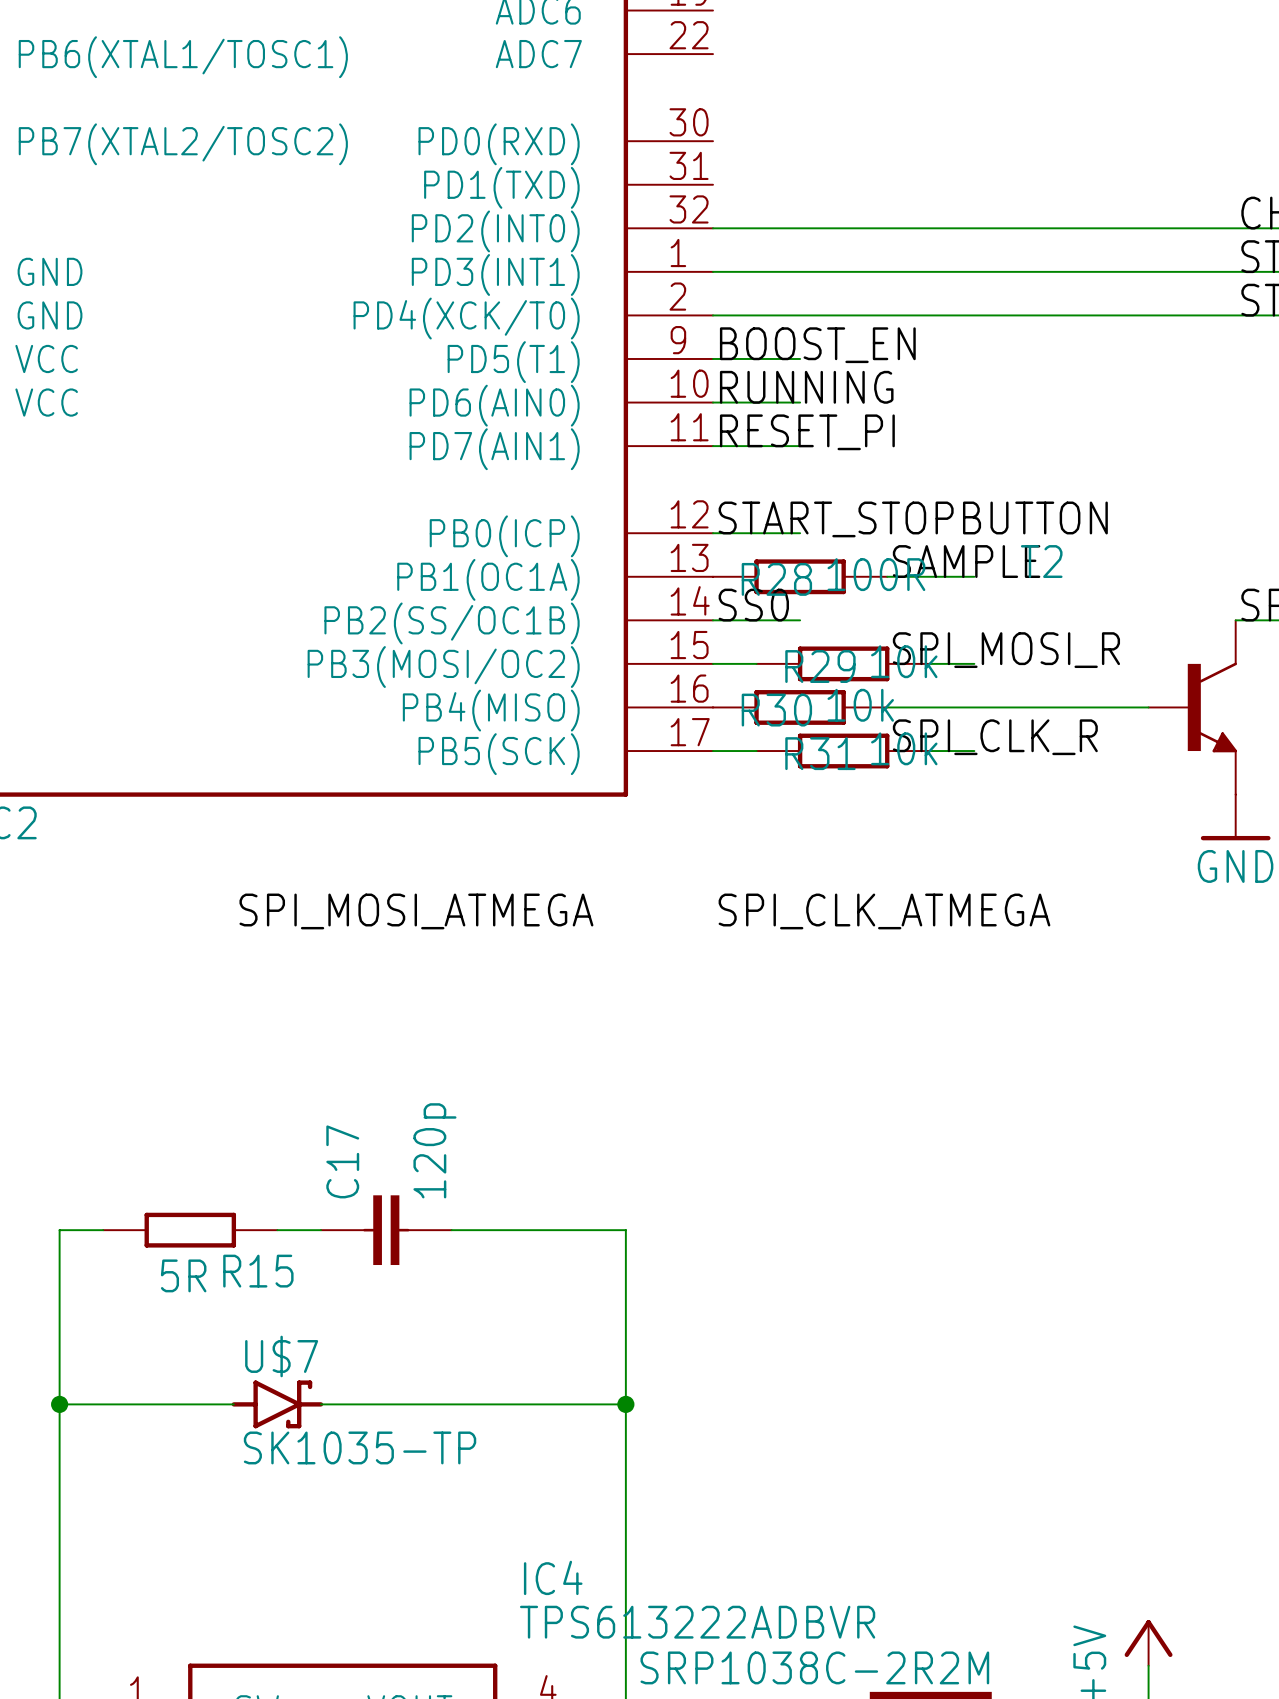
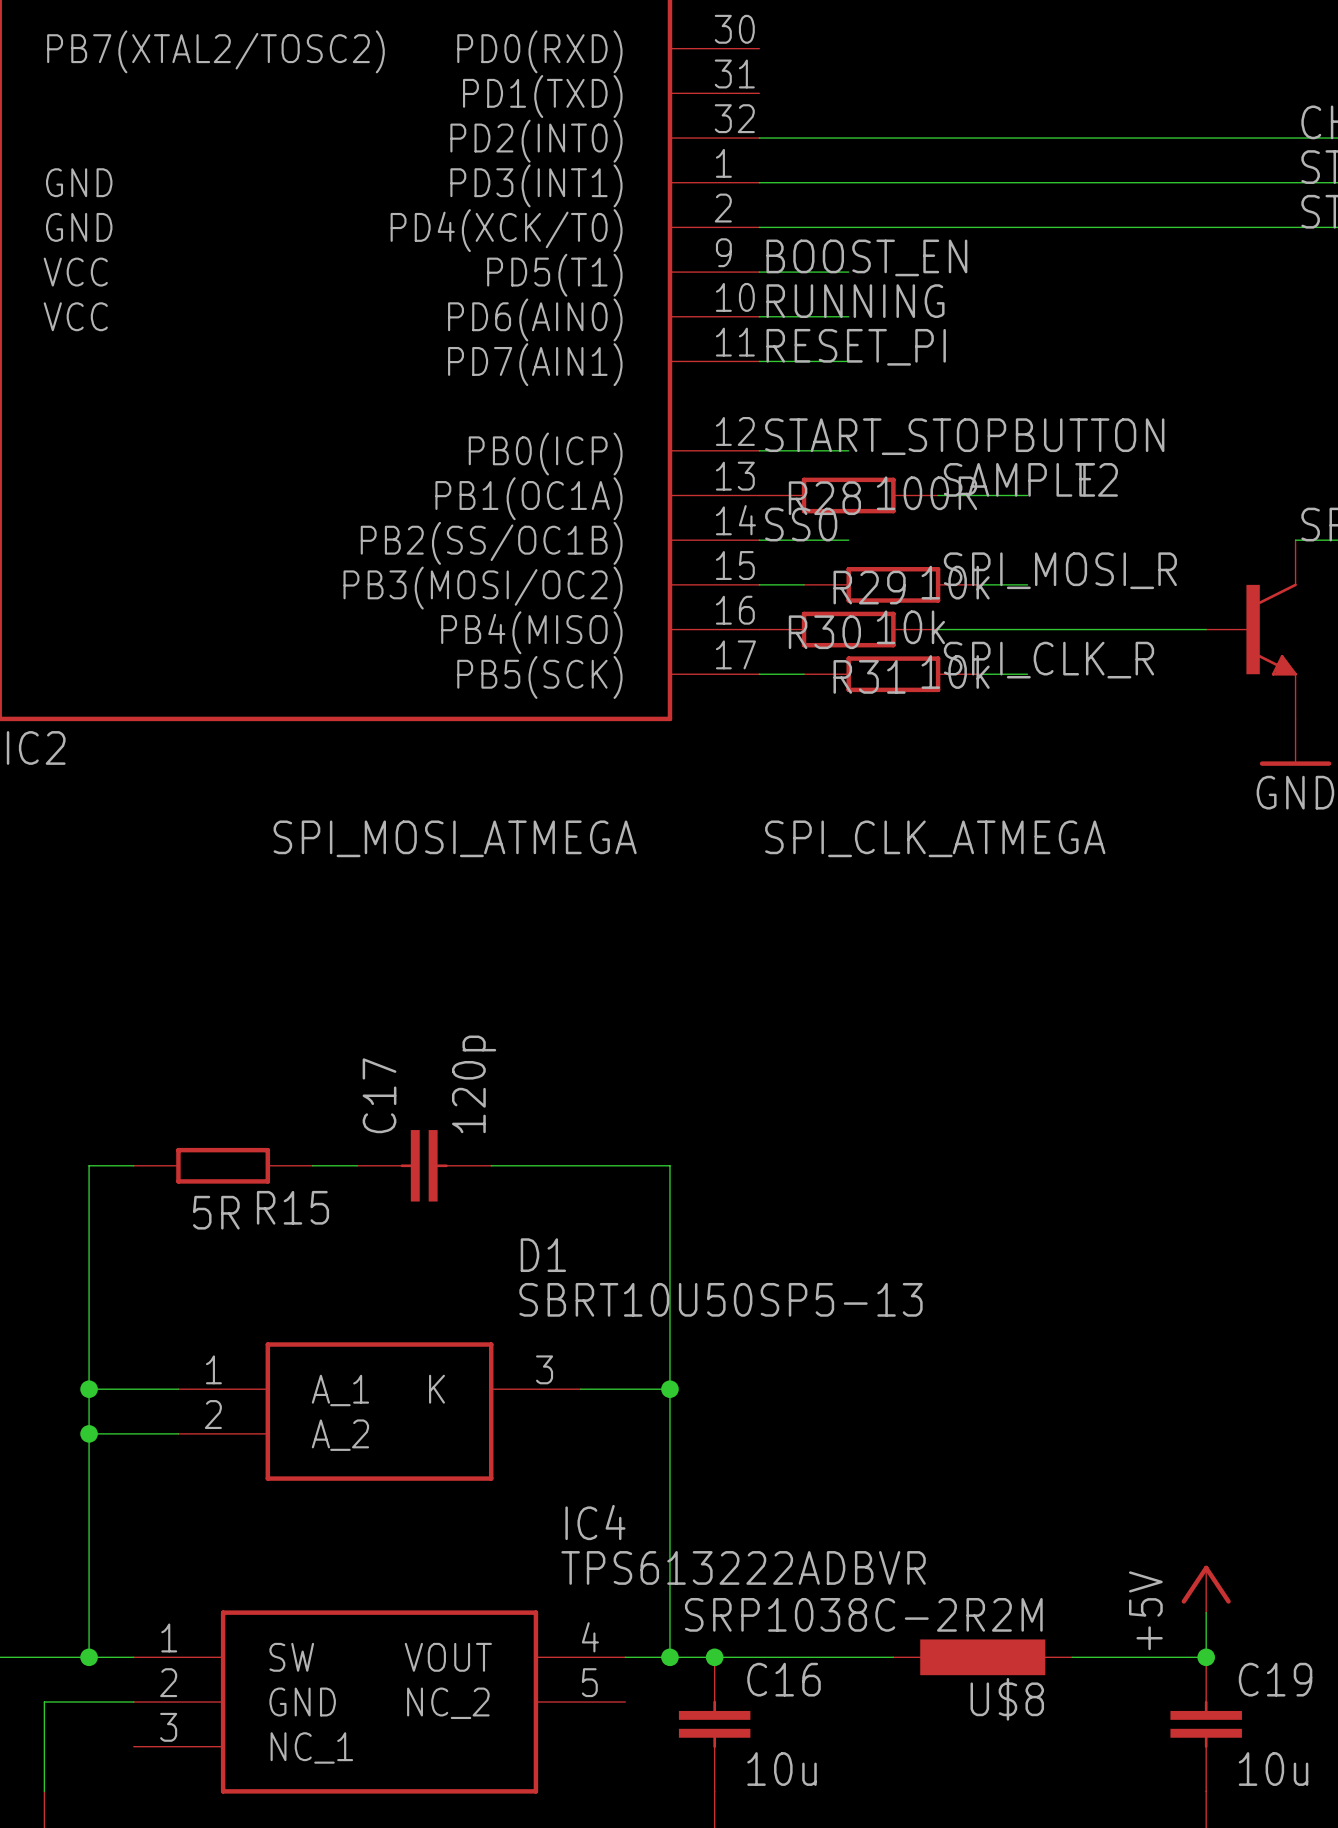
wire: (59, 1404) (233, 1404) -> none
junction: (59, 1404) -> none
U$7: SK1035-TP (277, 1404) -> none
wire: (320, 1404) (625, 1404) -> none
junction position: (625, 1404) -> (669, 1389)
wire: none -> (89, 1389) (178, 1389)
junction: none -> (89, 1389)
wire: none -> (580, 1389) (669, 1389)
D1: none -> SBRT10U50SP5-13 (379, 1411)
wire: none -> (89, 1433) (178, 1433)
junction: none -> (89, 1433)

